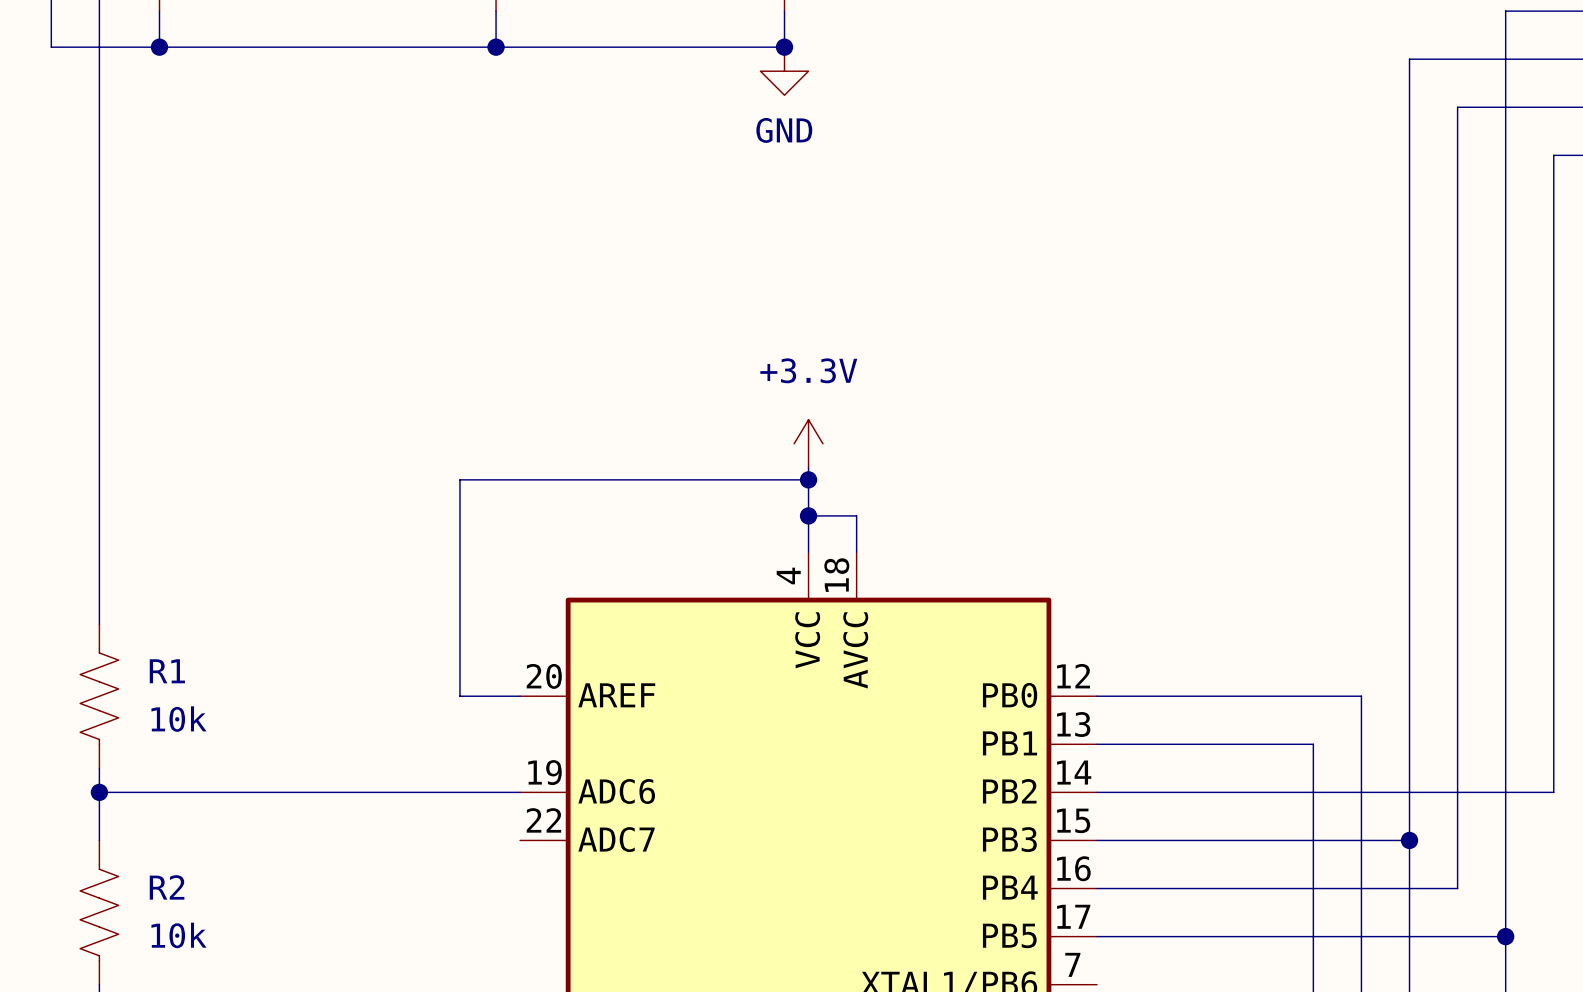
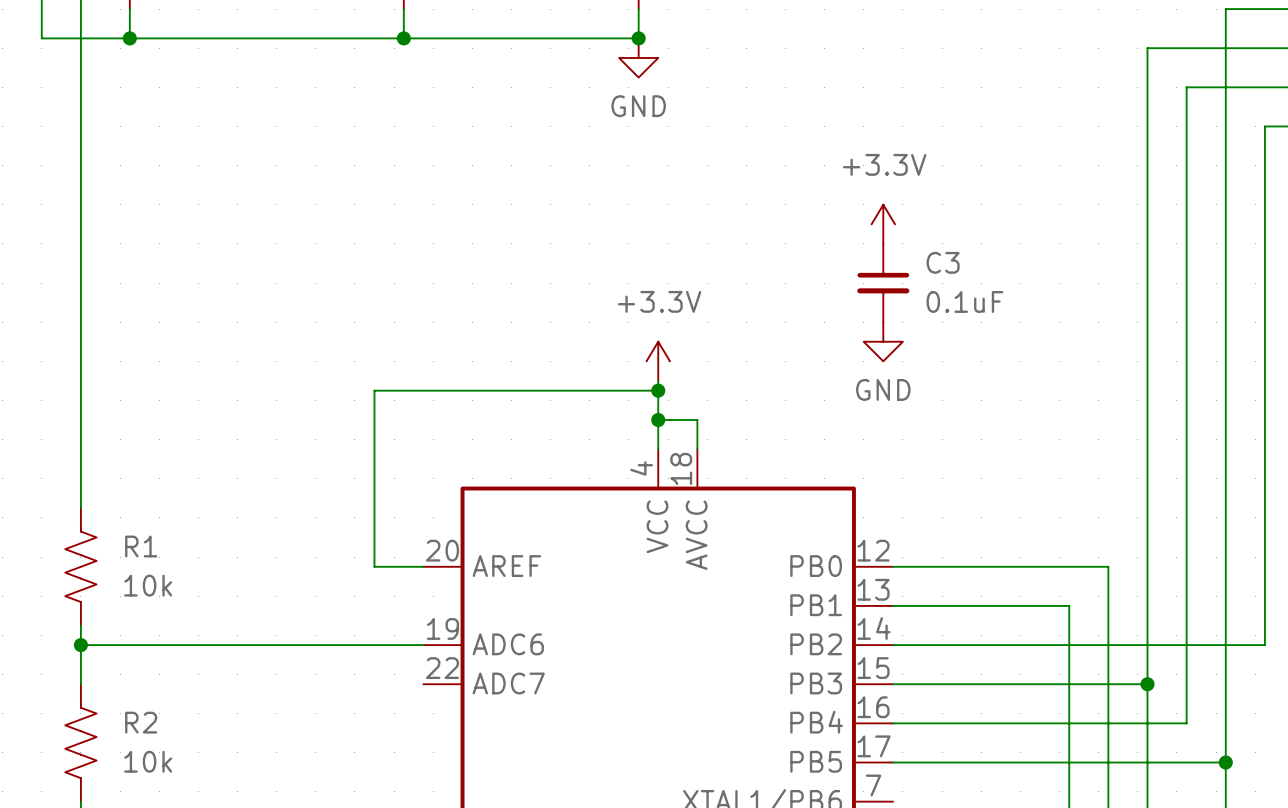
power symbol: none -> +3.3V (883, 224)
C3: none -> 0.1uF (883, 283)
power symbol: none -> GND (883, 341)

